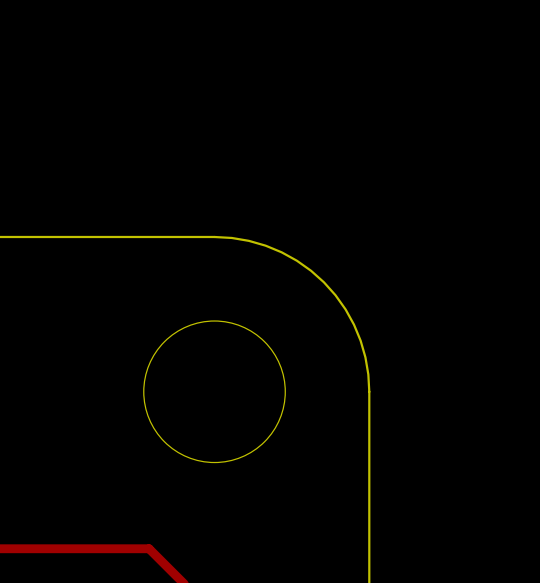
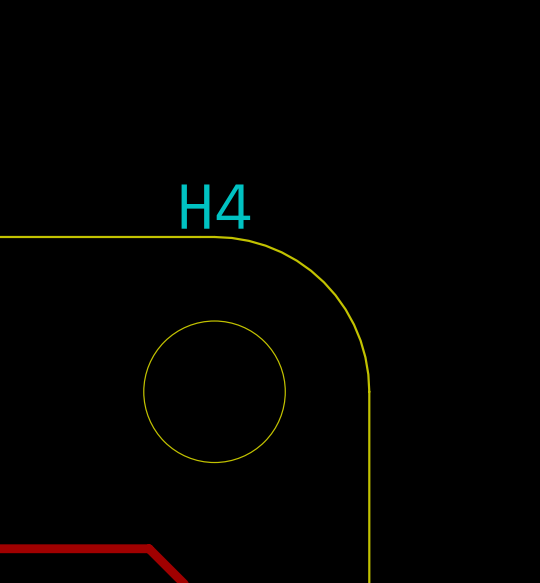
H4 name: none -> H4 (215, 206)

